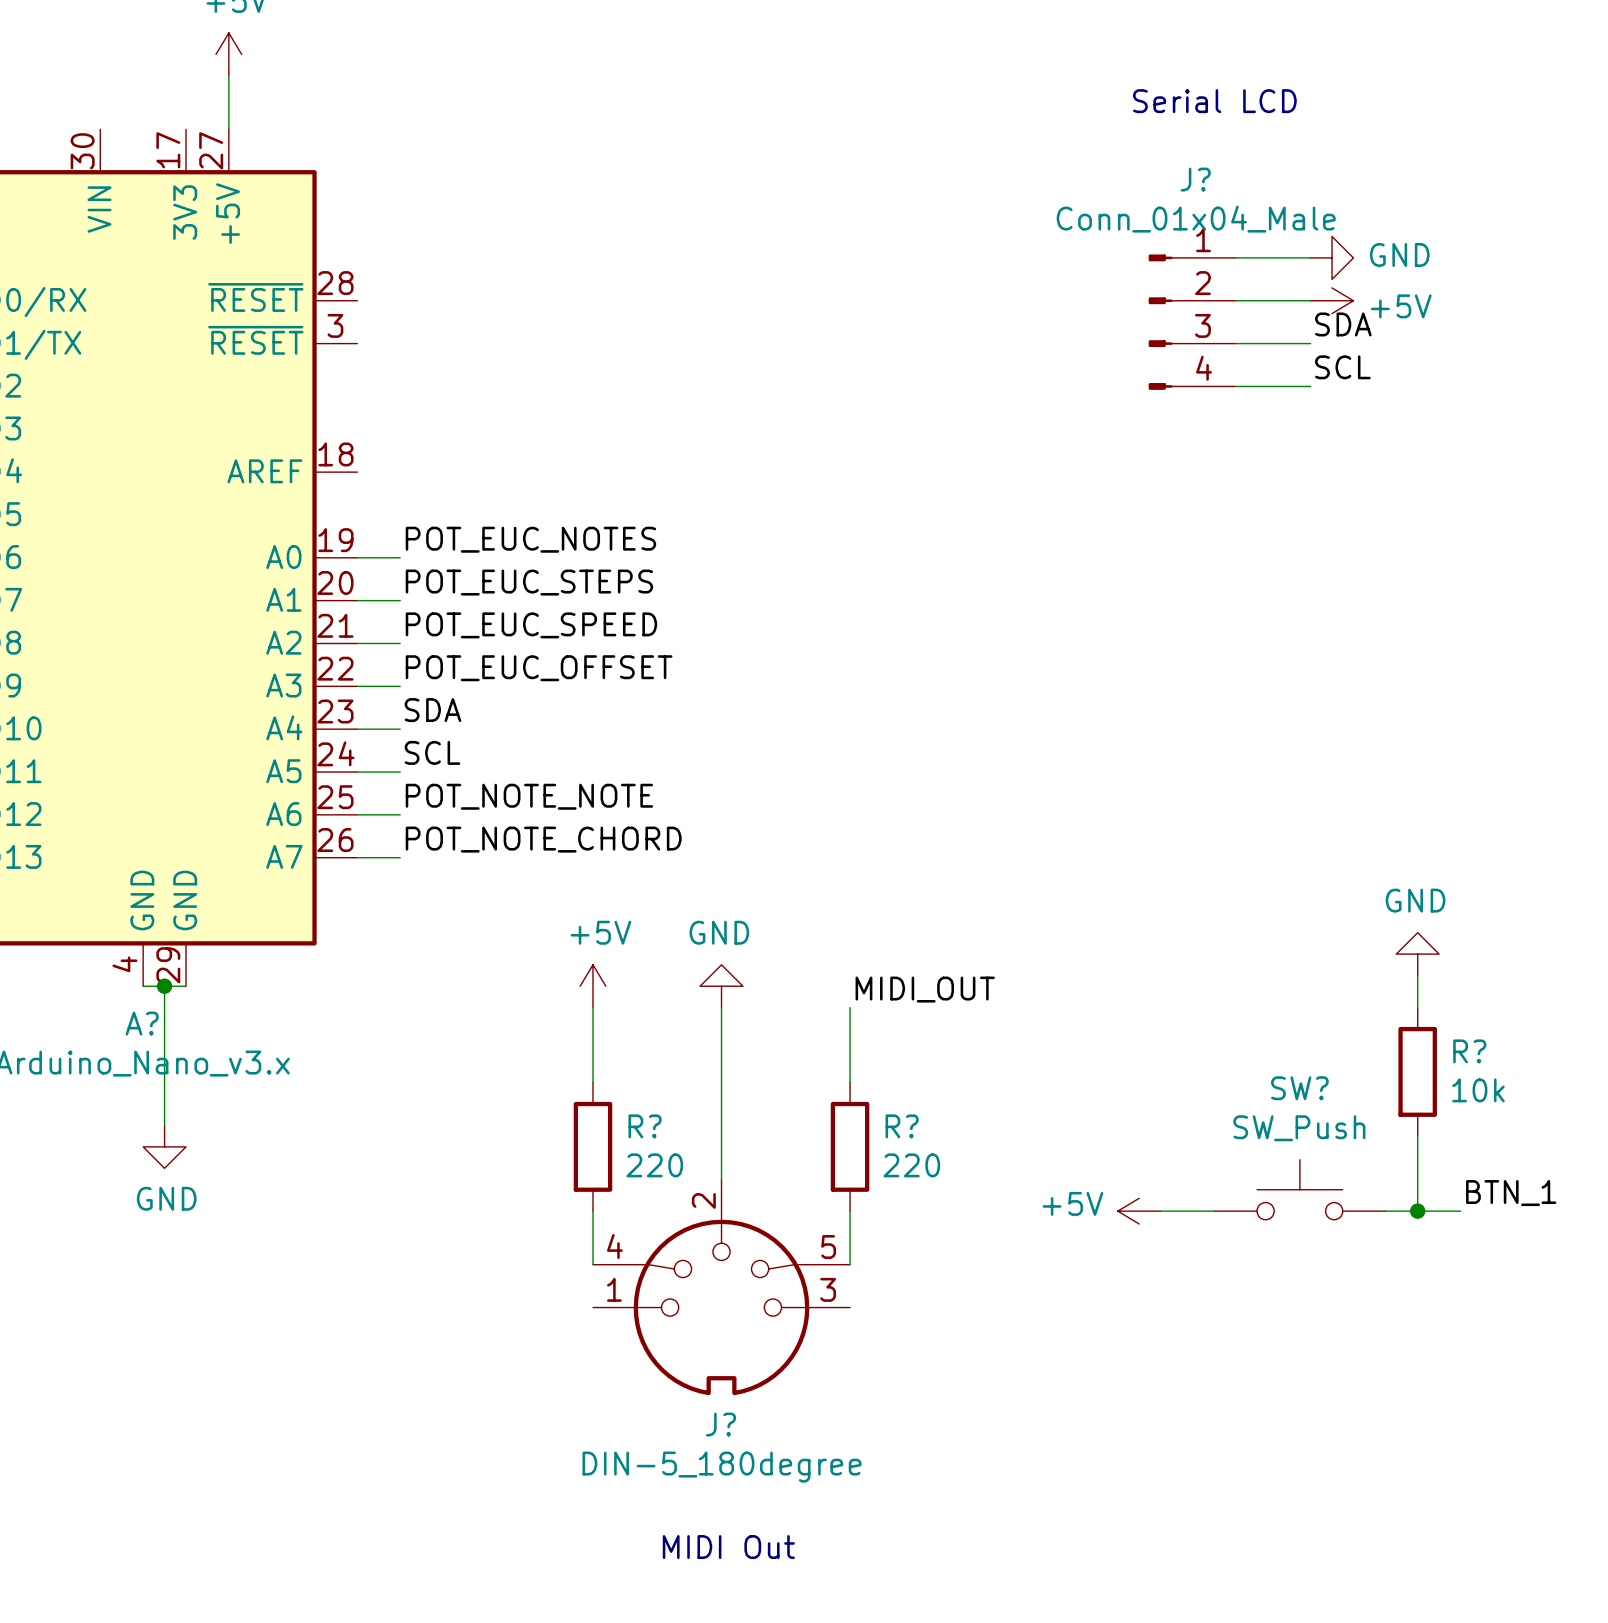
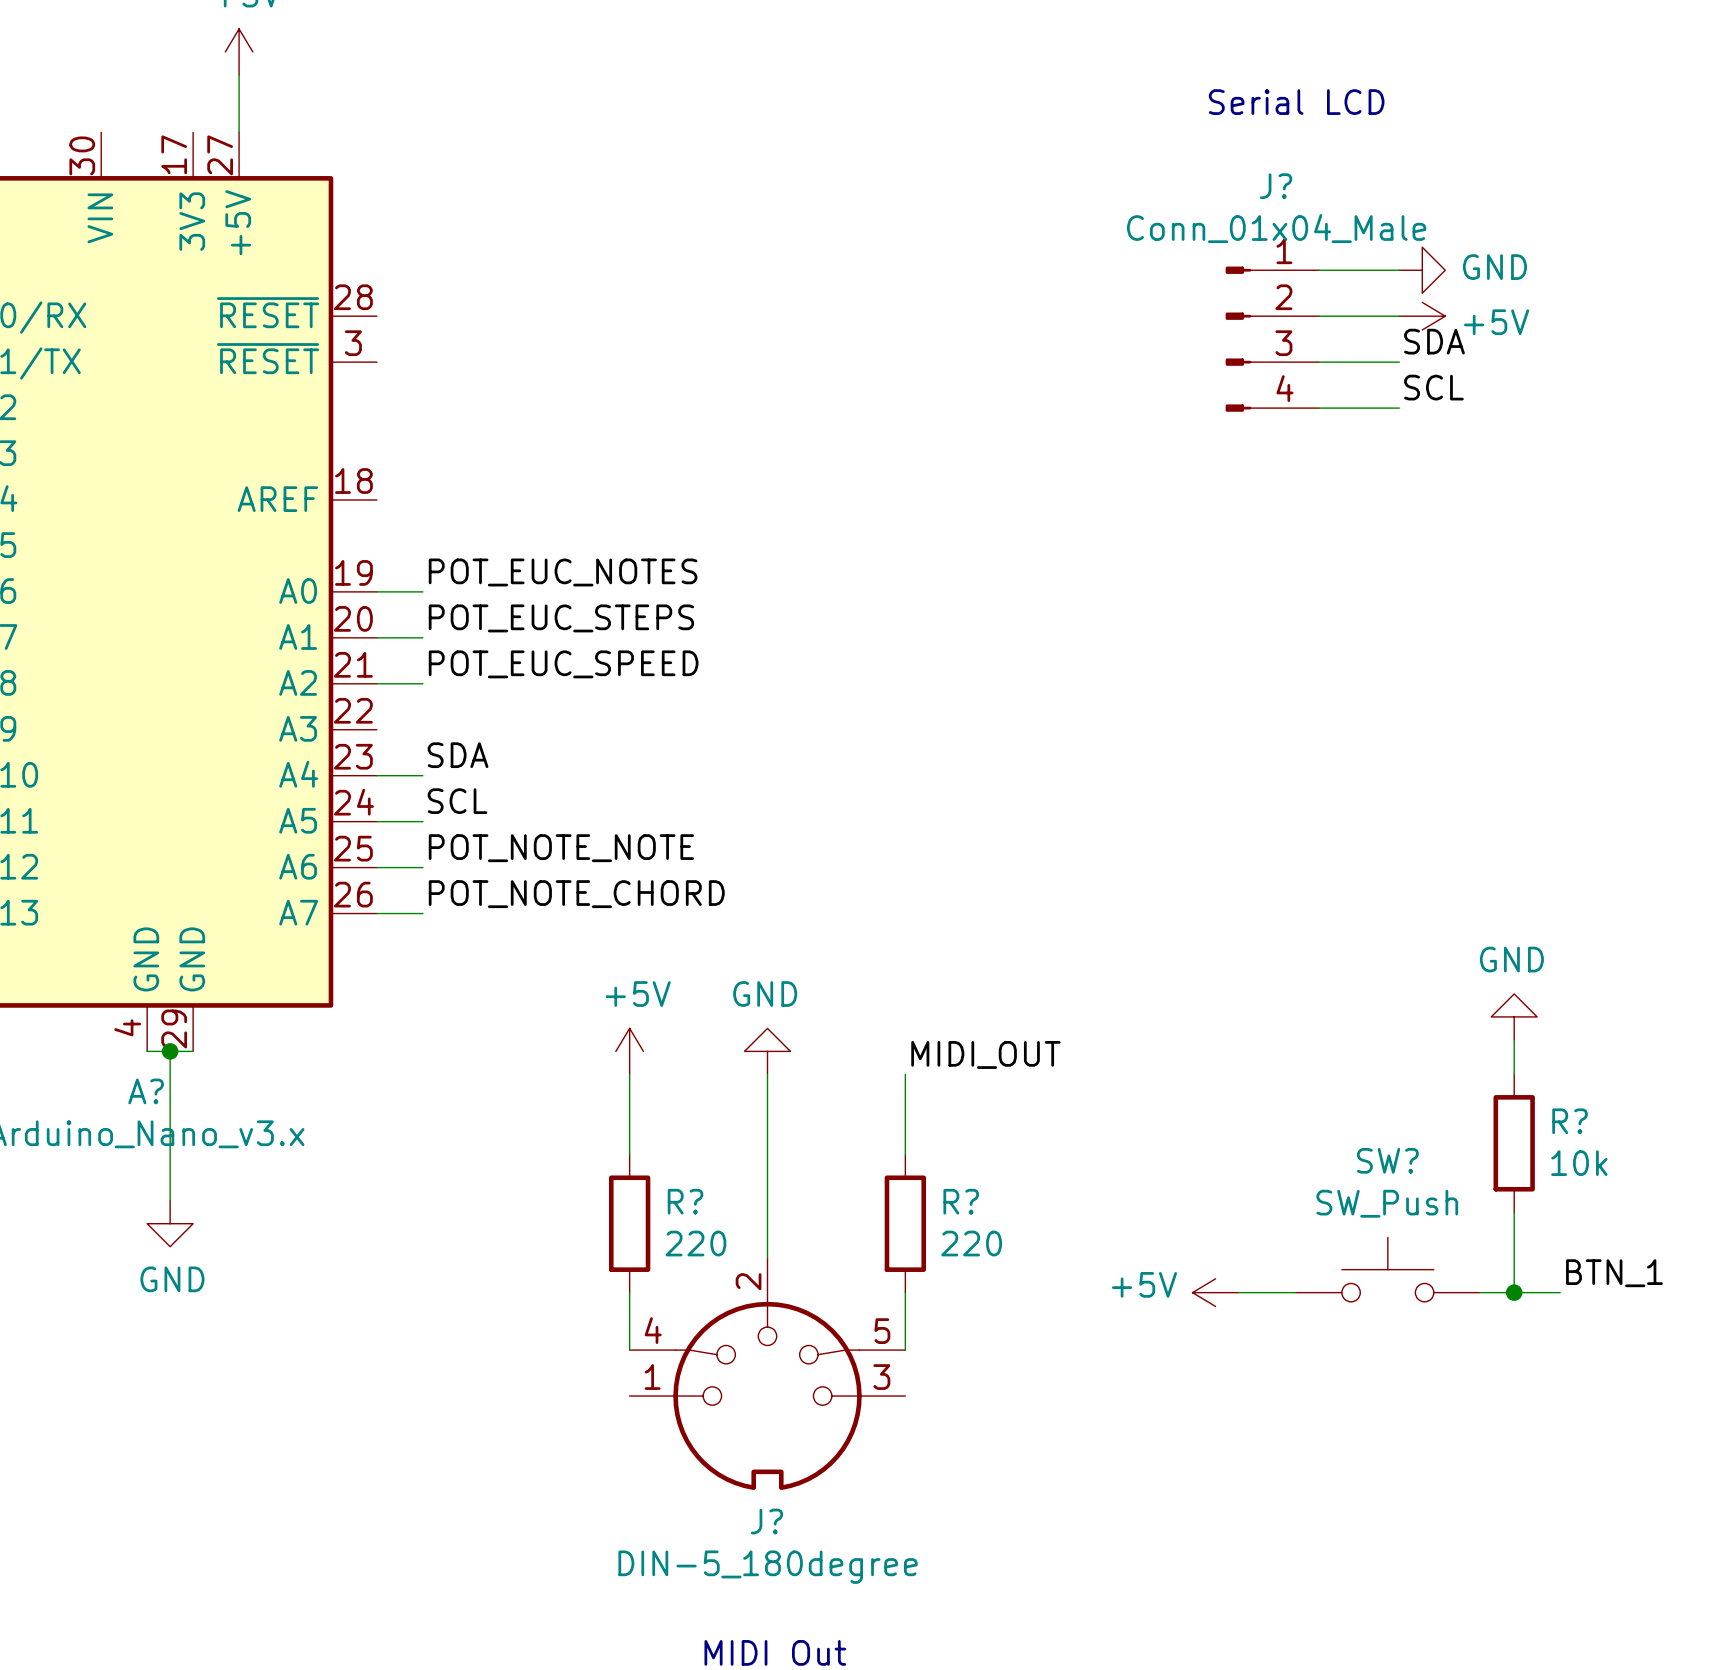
label: POT_EUC_OFFSET (539, 668) -> none
wire: (357, 686) (400, 686) -> none

